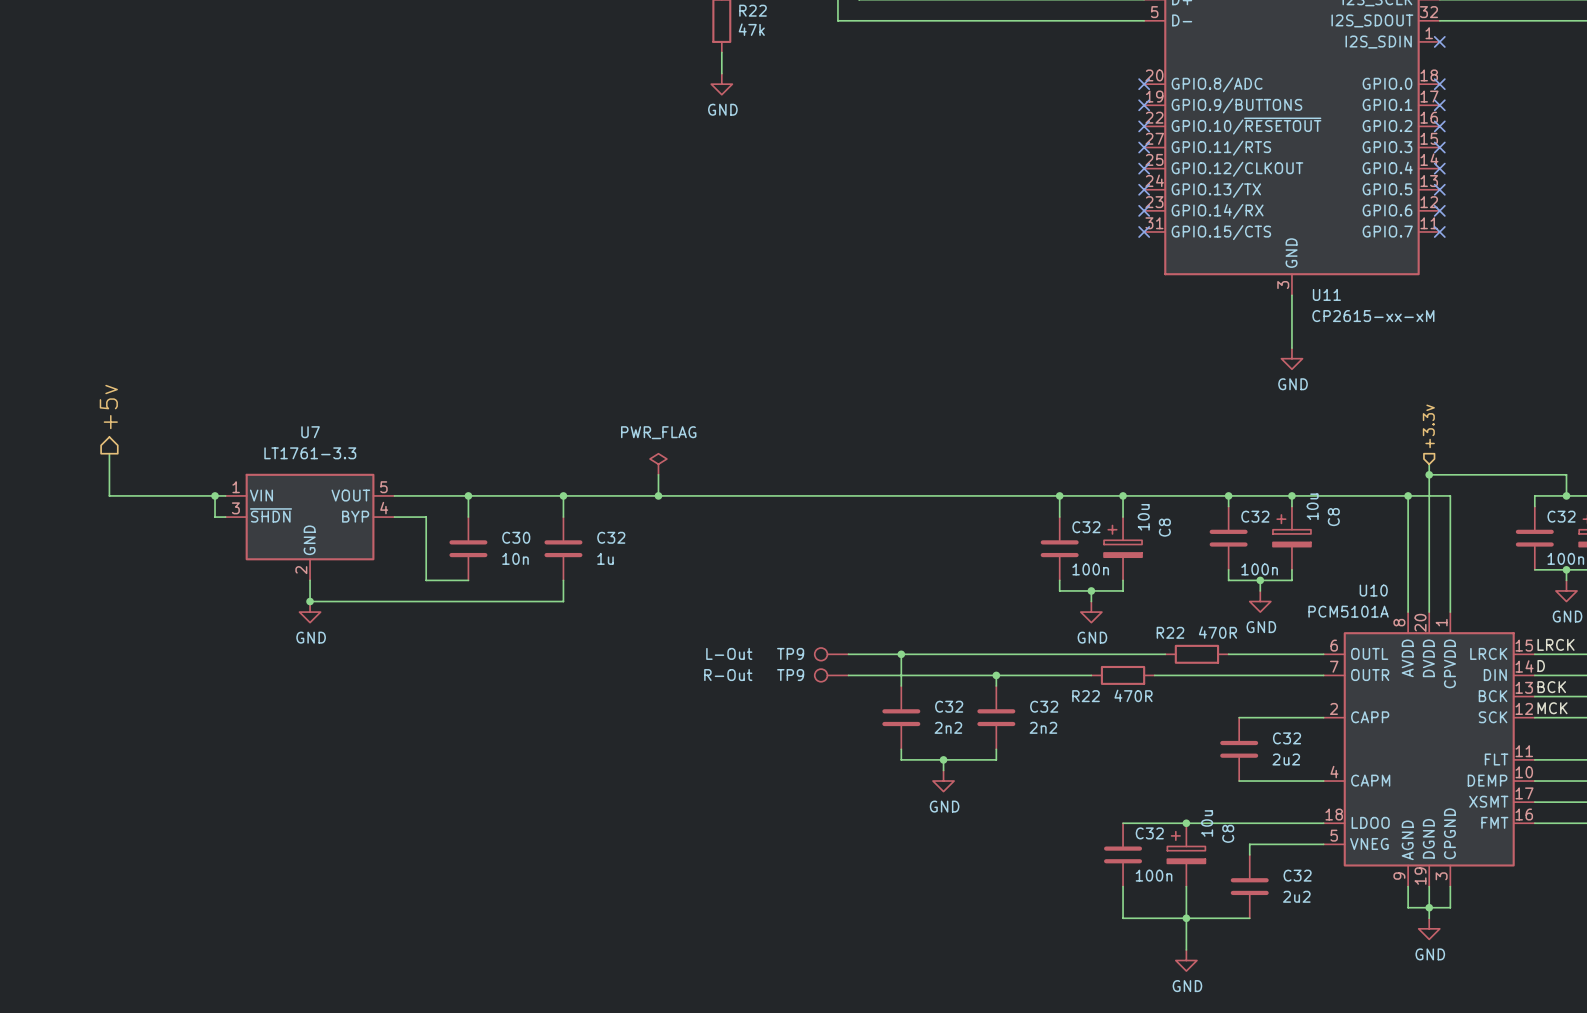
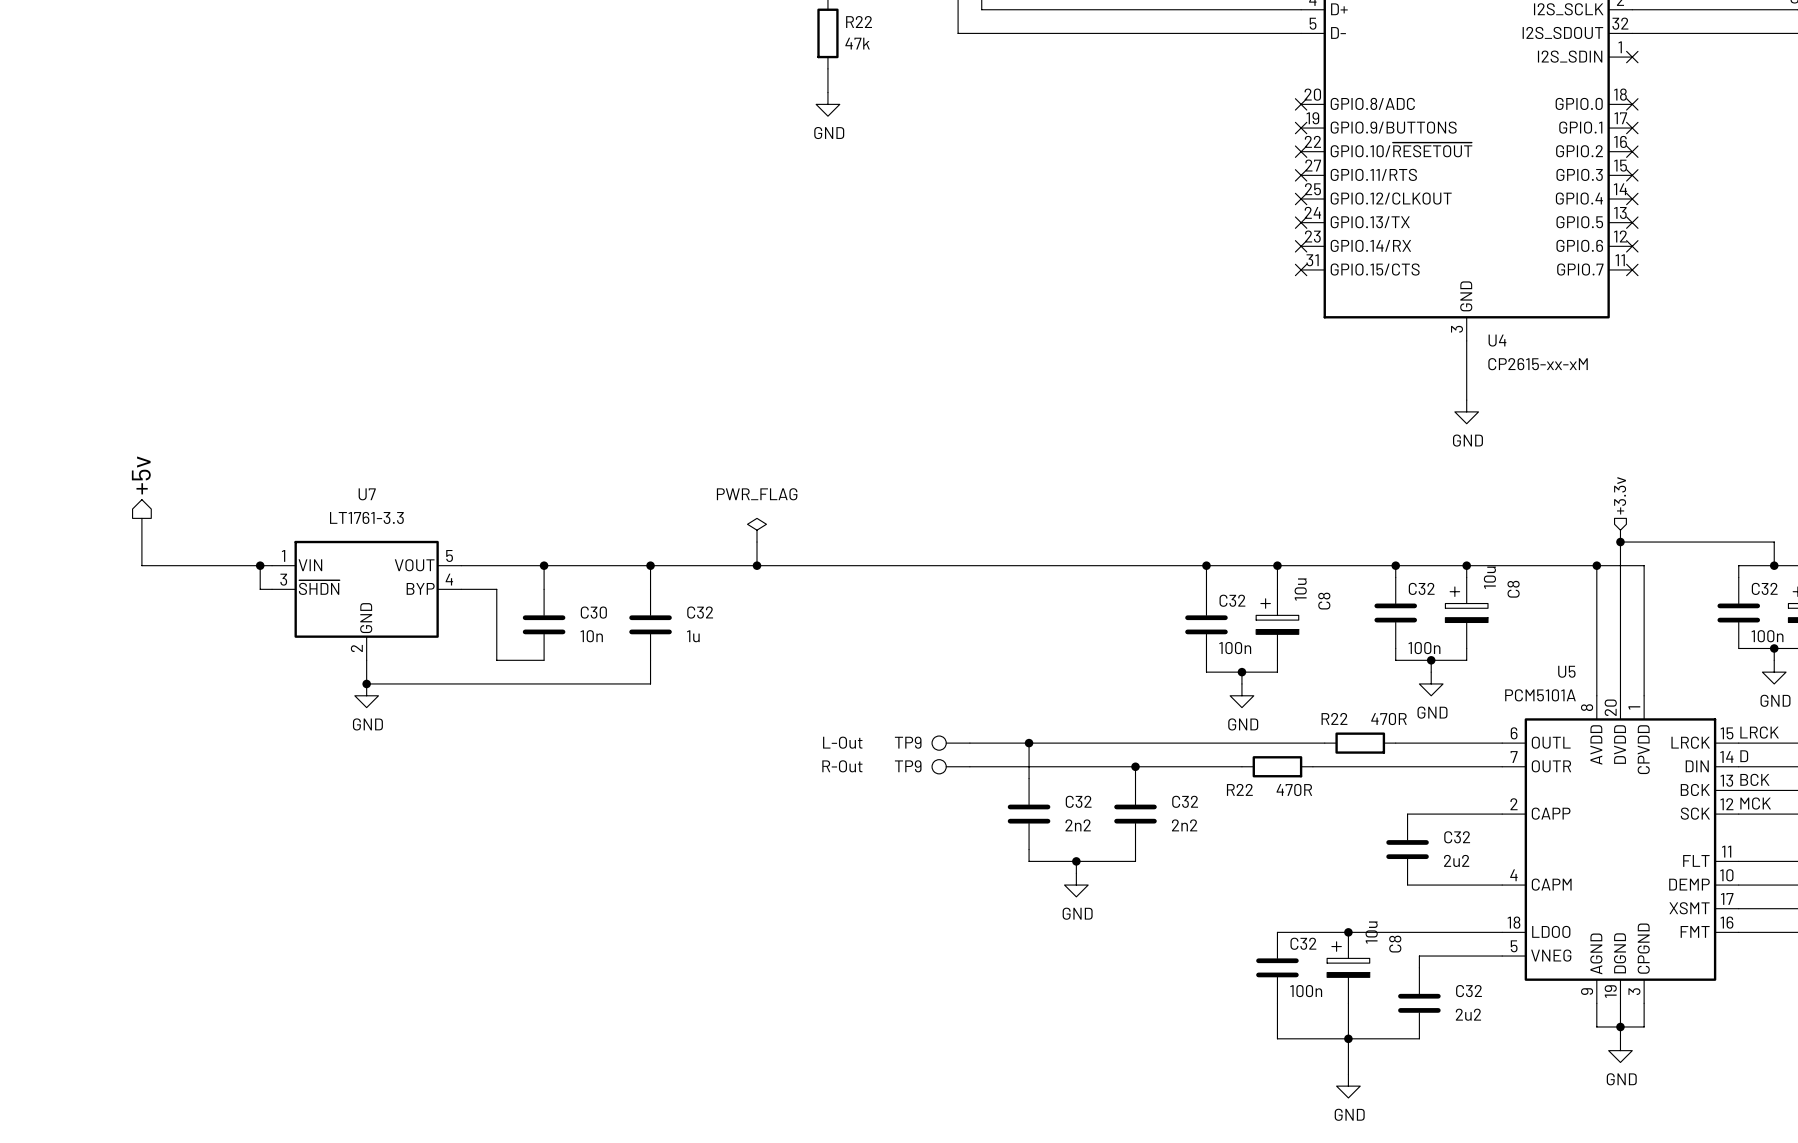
U11 name: U11 (1326, 294) -> U4 (1497, 340)
U10 name: U10 (1373, 590) -> U5 (1566, 671)

